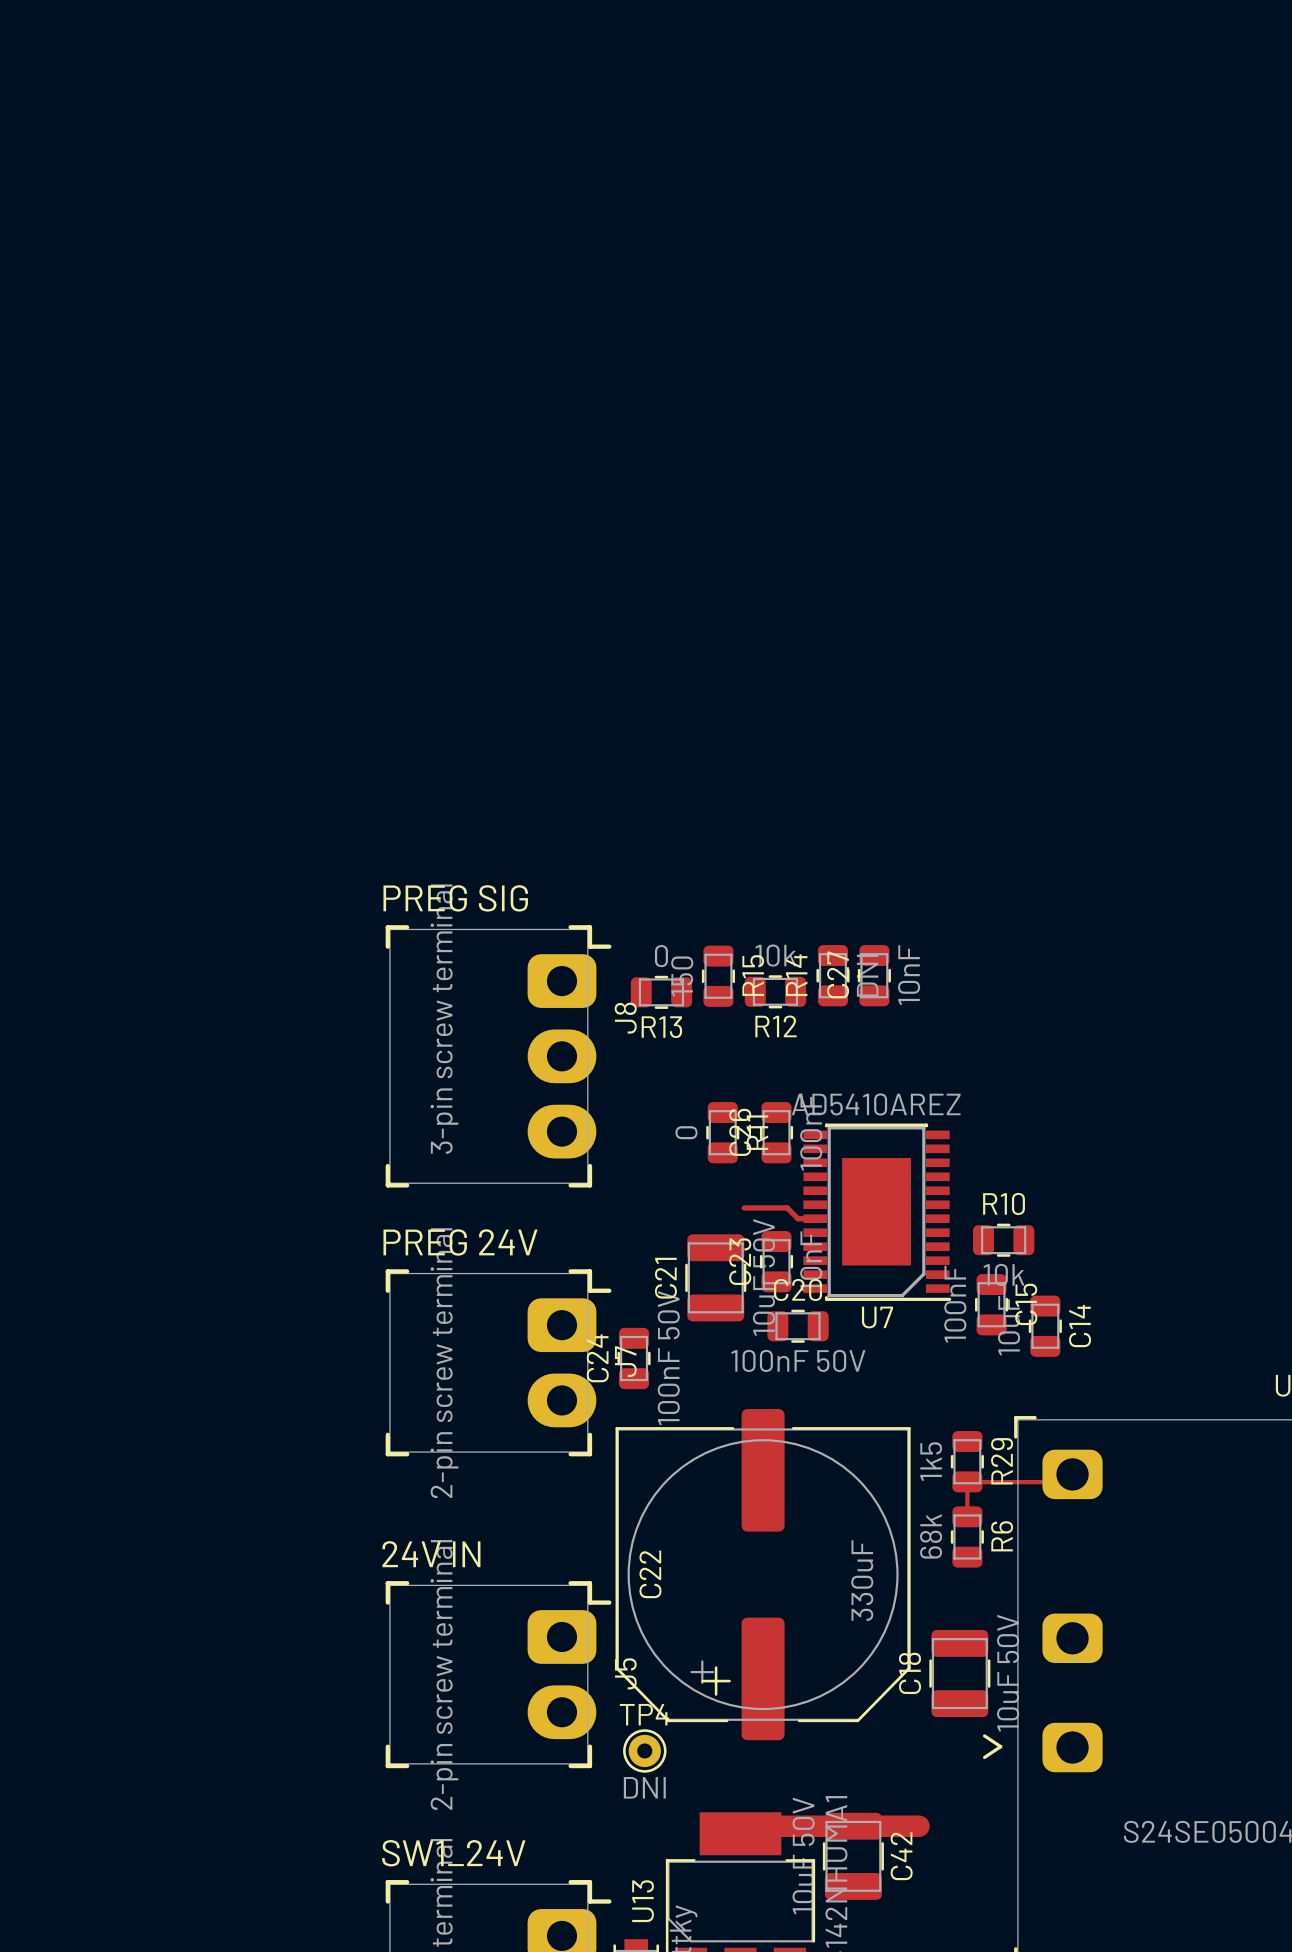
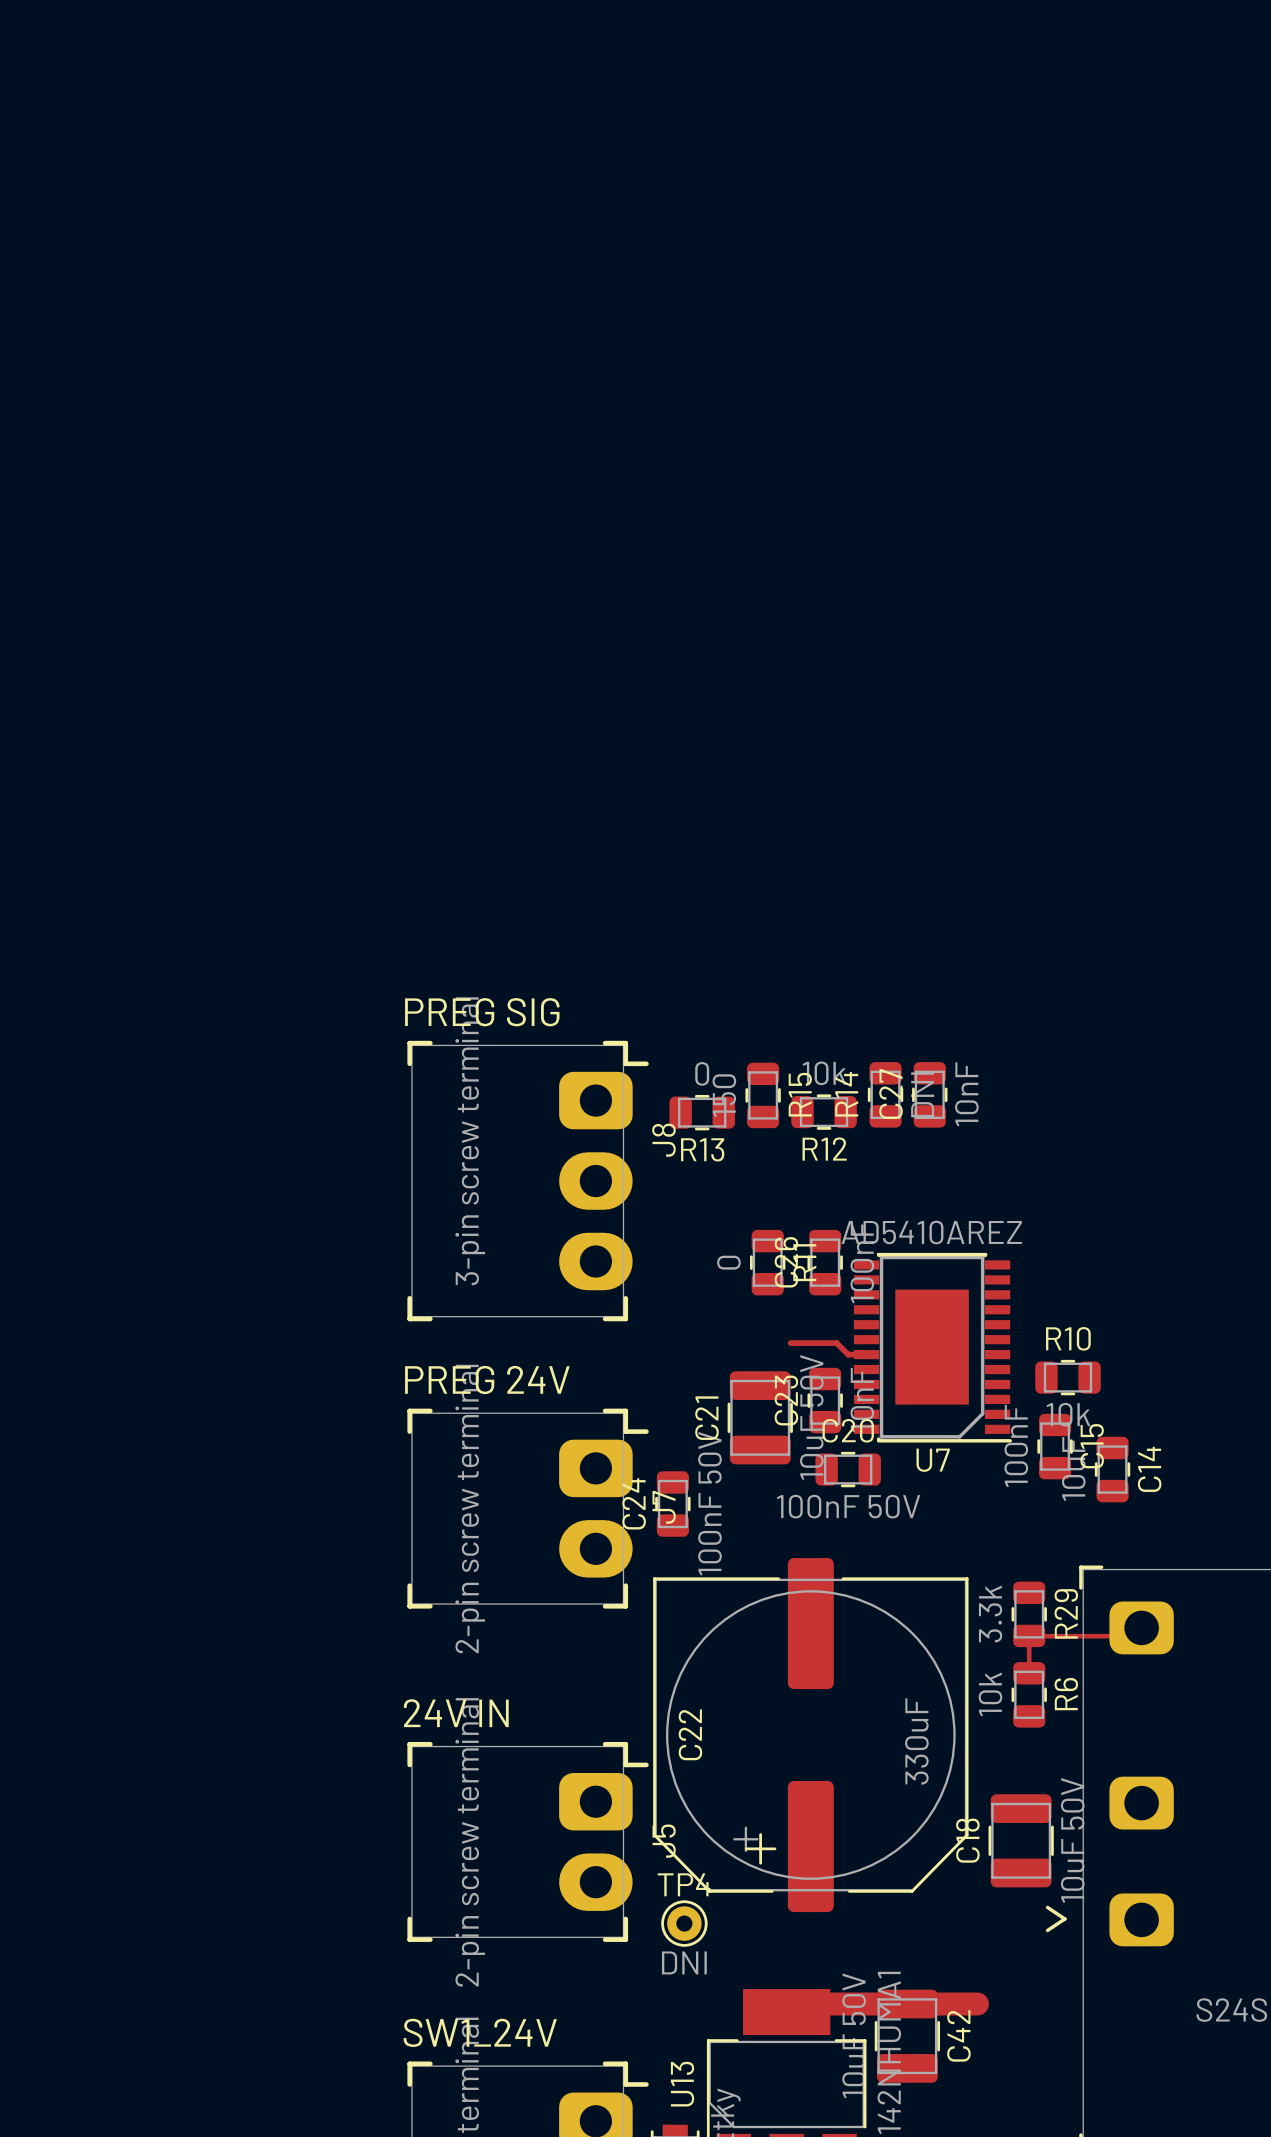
R29 value: 1k5 (931, 1461) -> 3.3k (990, 1614)
R6 value: 68k (931, 1536) -> 10k (990, 1694)

